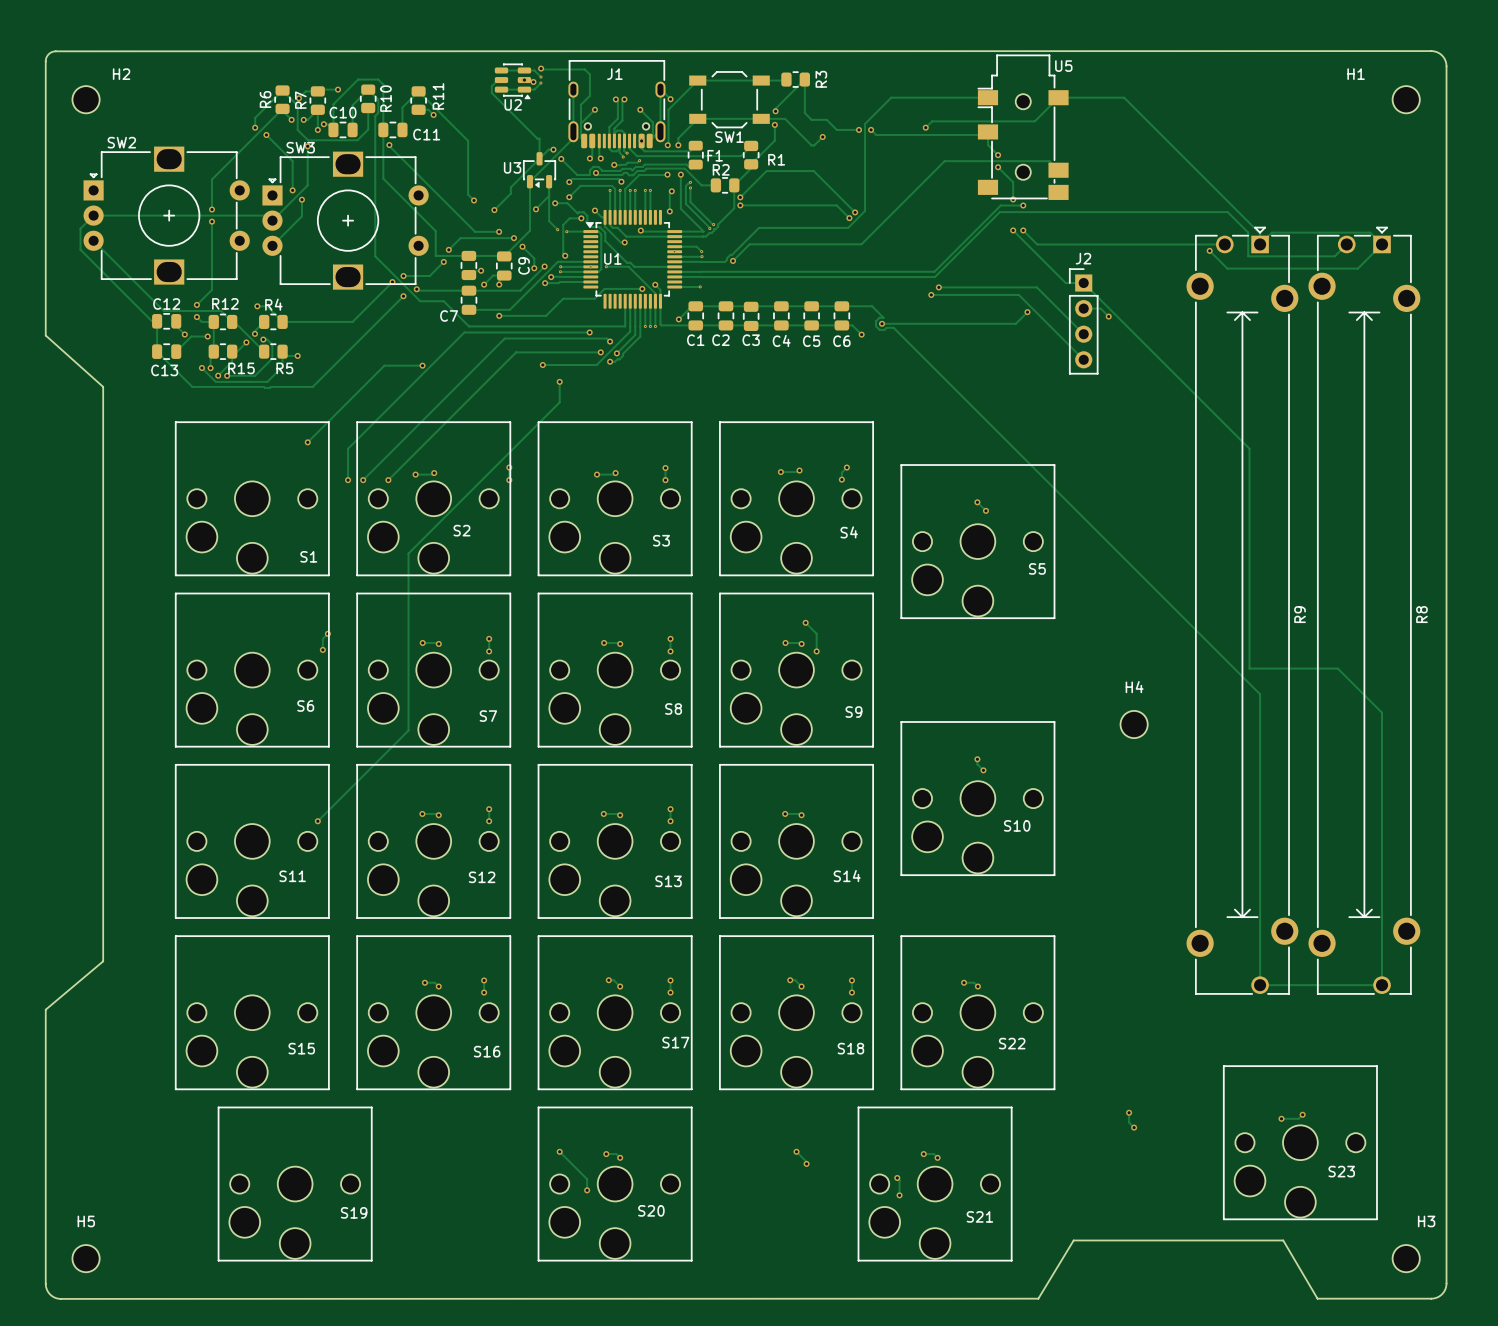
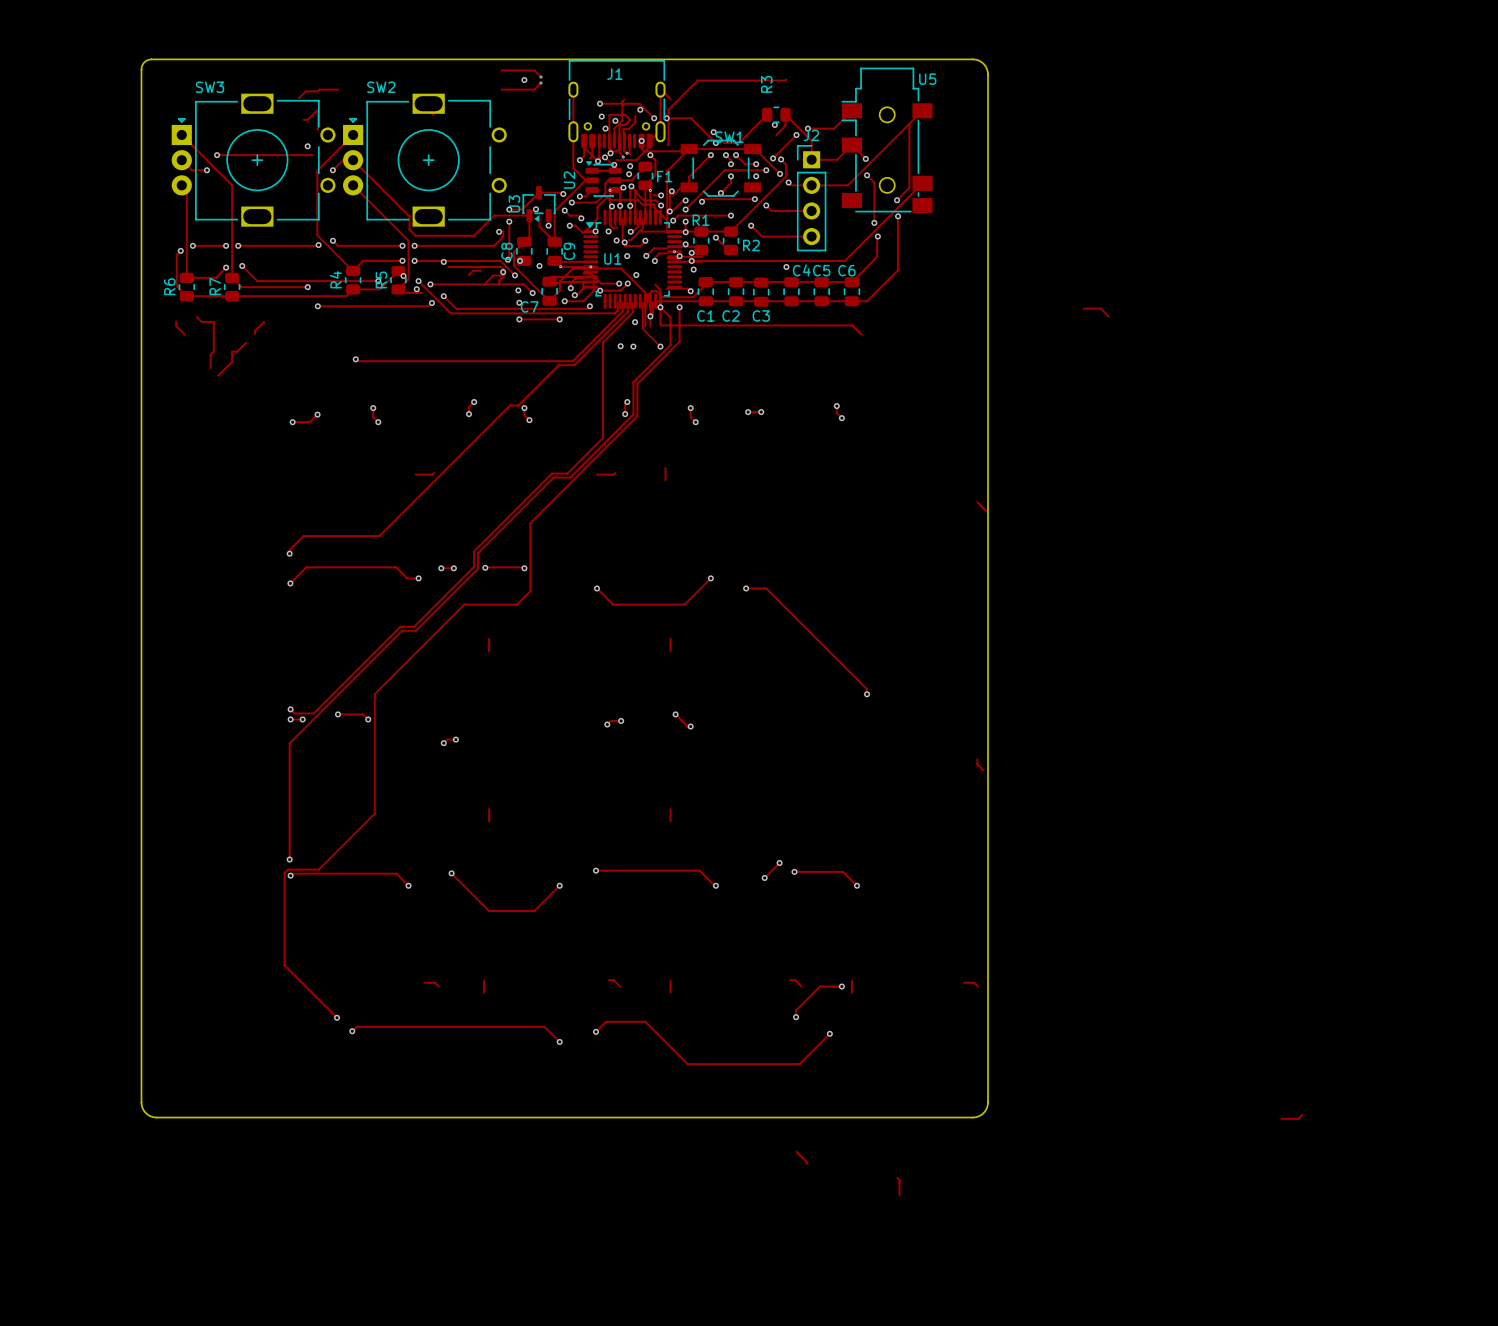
board edge: (1431, 51) (55, 51) (48, 54) (45, 61) (45, 335) (103, 386) (103, 961) (45, 1009) (45, 1283) (50, 1294) (60, 1298) (1038, 1298) (1073, 1240) (1283, 1240) (1317, 1298) (1431, 1298) (1442, 1294) (1446, 1283) (1446, 66) (1442, 55) (1431, 51) -> (151, 59) (144, 62) (141, 69) (141, 1102) (144, 1111) (150, 1116) (156, 1117) (972, 1117) (982, 1114) (986, 1108) (987, 1102) (987, 74) (984, 65) (978, 60) (972, 59) (151, 59)
track: (541, 68) (584, 69) (589, 74) (589, 95) (581, 104) (581, 137) (584, 140) -> none
via: (541, 68) -> none
R3 position: (795, 79) -> (776, 114)
R3 name position: R3 (821, 79) -> R3 (766, 84)
track: (501, 80) (497, 80) (491, 86) (491, 93) (539, 138) (539, 158) -> none
U2 rotation: 0° (512, 81) -> 180° (603, 178)
U2 position: (512, 81) -> (603, 178)
via: (533, 82) -> none
via: (337, 89) -> none
track: (987, 97) (891, 97) (865, 123) (865, 211) (848, 227) (758, 227) (724, 261) (701, 261) -> none
via: (298, 98) -> none
R10: (368, 98) -> none
H2: (86, 99) -> none
R6 position: (282, 99) -> (186, 287)
track: (615, 99) (617, 101) (617, 118) (609, 127) -> (619, 140) (619, 125) (625, 124) (630, 119) (625, 114) (610, 114) (609, 127)
via: (615, 99) -> none
via: (624, 99) -> none
via: (670, 99) -> none
SW1 position: (729, 99) -> (720, 168)
H1: (1406, 99) -> none
R7 position: (317, 100) -> (232, 287)
R11: (418, 100) -> none
track: none -> (600, 103) (639, 103) (654, 118)
via: none -> (600, 103)
U2 name position: U2 (513, 104) -> U2 (569, 180)
track: (368, 108) (368, 129) (357, 140) (308, 140) (297, 129) (297, 105) (282, 90) (255, 117) (255, 127) -> none
track: (594, 109) (581, 123) -> none
via: (594, 109) -> none
track: (640, 109) (652, 122) (652, 137) -> none
track: none -> (851, 110) (834, 128) (807, 128)
track: none -> (922, 110) (847, 185) (791, 185) (788, 182)
track: (775, 111) (775, 108) (804, 79) (804, 113) (811, 119) (826, 119) (836, 129) (858, 129) -> none
via: (775, 111) -> none
via: (433, 114) -> none
track: none -> (767, 114) (738, 143) (724, 143) (713, 132)
via: none -> (601, 116)
via: none -> (654, 118)
track: none -> (666, 118) (691, 118) (715, 143)
via: none -> (666, 118)
track: (291, 119) (282, 108) (212, 179) (212, 209) -> none
via: (291, 119) -> none
via: (303, 119) -> none
via: none -> (615, 120)
track: none -> (909, 123) (909, 187) (897, 200)
track: (323, 124) (327, 124) (333, 129) (333, 104) (358, 79) (378, 79) (383, 84) (383, 178) (435, 231) (435, 255) (504, 256) (529, 230) (529, 181) (573, 138) -> (539, 215) (539, 226) (554, 241) (554, 211) (585, 180) (573, 168) (573, 138)
via: (323, 124) -> none
track: (774, 124) (774, 140) (751, 164) (751, 168) (734, 185) (734, 208) (711, 233) (703, 236) -> none
via: (255, 127) -> none
track: (925, 127) (932, 121) (1034, 121) (1058, 97) (1124, 97) (1260, 233) (1260, 244) (1271, 232) (1370, 232) (1382, 244) (1357, 268) (1227, 268) (1209, 250) -> none
via: (925, 127) -> none
U5 position: (1023, 127) -> (887, 140)
via: none -> (605, 128)
via: none -> (807, 128)
via: (317, 129) -> none
C10: (343, 129) -> none
track: (352, 129) (352, 105) (368, 89) (378, 99) (378, 113) (375, 116) (375, 256) (420, 301) (443, 301) (468, 326) (625, 326) (625, 301) -> none
C11: (392, 129) -> none
track: (402, 129) (402, 107) (418, 91) (468, 140) (468, 194) (474, 200) -> none
via: (858, 129) -> none
track: (871, 129) (876, 134) (984, 134) (987, 131) (987, 145) (998, 155) -> none
via: (871, 129) -> none
track: (623, 132) (617, 130) (614, 133) -> (623, 132) (623, 128) (628, 128) (635, 122) (635, 115)
via: none -> (713, 132)
track: none -> (181, 134) (232, 185) (232, 277) (241, 287) (307, 287)
track: (266, 134) (292, 161) (292, 190) -> none
via: (266, 134) -> none
track: none -> (353, 134) (317, 170) (317, 235) (353, 271) (363, 260) (402, 260)
track: none -> (776, 134) (785, 125) (785, 114) (811, 140) (811, 159)
track: none -> (796, 134) (773, 158)
via: none -> (796, 134)
track: (822, 136) (814, 145) (811, 145) (785, 118) (697, 118) (678, 138) (678, 145) -> none
via: (822, 136) -> none
track: none -> (582, 140) (584, 140) (584, 155) (579, 160)
track: none -> (649, 140) (649, 146) (636, 160) (616, 160)
via: none -> (715, 143)
track: (389, 145) (475, 231) (499, 231) -> none
via: (389, 145) -> none
via: (667, 145) -> none
via: (678, 145) -> none
track: (751, 145) (740, 156) (637, 156) (629, 148) -> (630, 154) (629, 148)
SW2 footprint: [83, 146, 250, 285] -> [343, 93, 507, 227]
track: (307, 146) (307, 185) (272, 220) (267, 215) (93, 215) (80, 228) (80, 249) (152, 321) (157, 321) (157, 351) (192, 386) (312, 386) (403, 296) -> none
track: none -> (584, 147) (598, 161)
track: (553, 149) (548, 149) (510, 187) (510, 193) (494, 210) -> none
via: (553, 149) -> none
SW3 footprint: [262, 151, 429, 290] -> [171, 93, 336, 227]
via: none -> (610, 153)
track: none -> (217, 155) (312, 155)
via: none -> (217, 155)
track: none -> (650, 155) (655, 160) (655, 175) (645, 185)
via: none -> (650, 155)
F1 position: (695, 155) -> (645, 175)
track: none -> (710, 155) (689, 176) (689, 187) (681, 187) (673, 195)
via: none -> (710, 155)
track: none -> (725, 155) (731, 160) (731, 164)
via: none -> (725, 155)
track: none -> (736, 155) (745, 164) (756, 164)
via: none -> (736, 155)
R1 position: (751, 155) -> (701, 240)
via: (998, 155) -> none
track: none -> (605, 157) (615, 167) (615, 170) (592, 170)
via: none -> (605, 157)
track: (561, 158) (577, 174) (589, 174) (589, 170) (593, 166) (598, 166) (602, 170) (620, 170) (622, 168) (632, 170) (635, 166) (642, 166) (644, 164) (686, 164) (691, 169) (695, 164) -> none
via: (561, 158) -> none
via: (589, 158) -> none
via: (600, 158) -> none
via: none -> (773, 158)
track: none -> (865, 158) (851, 145) (837, 159) (802, 159)
via: none -> (865, 158)
R1 name position: R1 (776, 159) -> R1 (701, 220)
via: none -> (781, 159)
track: none -> (181, 160) (191, 170) (206, 170)
via: none -> (579, 160)
track: (639, 160) (625, 164) (614, 164) -> none
via: (639, 160) -> none
via: none -> (598, 161)
via: none -> (731, 164)
via: none -> (756, 164)
via: none -> (630, 166)
track: none -> (645, 166) (631, 180) (608, 180) (605, 183) (605, 193) (596, 202) (571, 202)
U3 name rotation: 0° (512, 167) -> 90° counterclockwise (514, 203)
track: (998, 167) (1013, 182) (1013, 199) -> none
via: (998, 167) -> none
via: none -> (206, 170)
track: none -> (332, 170) (343, 160) (353, 160) (409, 216) (409, 229) (415, 235) (474, 235) (494, 215) (529, 215) (529, 236) (513, 252) (513, 265) (548, 300) (560, 290) (560, 281) (572, 268) (621, 268) (647, 295)
via: none -> (332, 170)
U3 position: (539, 170) -> (539, 204)
track: none -> (766, 170) (724, 170) (685, 209)
via: none -> (766, 170)
track: (1058, 170) (1049, 161) (944, 161) (922, 183) -> none
track: (595, 172) (597, 174) (622, 174) (626, 172) (633, 175) (637, 171) (644, 171) (646, 168) (684, 168) (701, 185) (715, 185) -> none
via: (595, 172) -> none
track: none -> (780, 173) (755, 149) (689, 149) (667, 171) (667, 233)
via: none -> (780, 173)
via: none -> (629, 174)
track: (667, 174) (639, 175) (625, 189) (625, 217) -> none
via: (667, 174) -> none
track: (680, 174) (680, 208) (703, 231) -> (781, 159) (786, 164) (786, 176) (731, 231) (703, 231)
via: (680, 174) -> none
track: none -> (867, 175) (874, 182) (874, 222)
via: none -> (867, 175)
track: none -> (731, 176) (731, 183) (720, 193)
via: none -> (731, 176)
via: none -> (756, 176)
track: (549, 181) (549, 221) (557, 229) -> none
track: (621, 181) (618, 179) (572, 179) (569, 182) -> none
via: (621, 181) -> none
via: (569, 182) -> none
track: (690, 182) (685, 186) (685, 203) (709, 228) -> none
via: (690, 182) -> none
via: none -> (788, 182)
track: none -> (181, 185) (186, 190) (186, 277) (215, 277) (226, 267)
track: none -> (353, 185) (408, 240) (408, 279) (398, 289) (401, 292) (421, 292)
R2 rotation: 0° (725, 185) -> 90° clockwise (731, 240)
R2 position: (725, 185) -> (731, 240)
track: none -> (631, 186) (644, 200) (656, 200) (661, 205)
via: none -> (631, 186)
via: none -> (623, 187)
track: (690, 187) (690, 202) (713, 224) -> none
via: (690, 187) -> none
track: none -> (592, 189) (585, 196) (579, 196)
via: (292, 190) -> none
via: (620, 190) -> none
via: (630, 190) -> none
via: (635, 190) -> none
via: (645, 190) -> none
via: none -> (720, 193)
track: none -> (563, 194) (539, 192) (522, 209) (509, 209)
via: none -> (563, 194)
track: none -> (653, 194) (661, 195)
track: (549, 195) (536, 209) -> none
via: none -> (661, 195)
via: none -> (579, 196)
track: (569, 197) (580, 185) (611, 185) (615, 189) (615, 217) -> none
via: (569, 197) -> none
track: (740, 197) (766, 171) (813, 171) (855, 212) -> none
via: (740, 197) -> none
track: (301, 199) (301, 216) (272, 245) -> none
via: (301, 199) -> none
track: none -> (754, 199) (704, 199) (702, 201)
via: none -> (754, 199)
via: (1013, 199) -> none
via: (474, 200) -> none
track: none -> (685, 200) (683, 200) (673, 210)
via: none -> (685, 200)
via: none -> (897, 200)
via: none -> (702, 201)
via: none -> (571, 202)
track: (555, 203) (567, 203) (577, 213) (583, 212) (587, 215) (586, 222) (591, 227) (600, 227) (605, 232) (605, 241) (626, 262) (630, 262) (634, 266) (674, 266) -> none
via: (555, 203) -> none
via: none -> (620, 205)
via: none -> (630, 205)
via: none -> (661, 205)
track: (740, 205) (836, 205) (849, 218) -> none
via: (740, 205) -> none
track: none -> (766, 205) (771, 210) (811, 210)
via: none -> (766, 205)
track: (1023, 205) (1000, 205) (934, 271) (701, 271) -> none
via: (1023, 205) -> none
via: none -> (611, 206)
via: (212, 209) -> none
via: none -> (509, 209)
via: none -> (685, 209)
via: (494, 210) -> none
track: none -> (564, 210) (569, 215) (579, 215)
via: none -> (564, 210)
track: (594, 210) (601, 217) (605, 217) (605, 226) (620, 242) (624, 242) -> none
via: (594, 210) -> none
via: (855, 212) -> none
track: none -> (731, 215) (678, 215) (673, 220)
via: none -> (731, 215)
track: none -> (898, 216) (898, 270) (867, 301) (654, 301) (652, 313) (650, 316)
via: none -> (898, 216)
track: (581, 218) (569, 218) (563, 224) (563, 253) (565, 255) -> none
via: (849, 218) -> none
track: none -> (622, 219) (622, 243) (625, 246) (640, 246) (645, 240)
track: none -> (637, 219) (637, 226) (630, 231)
track: none -> (642, 219) (642, 228) (628, 240)
track: none -> (667, 220) (654, 207) (654, 204) (642, 204) (637, 199) (609, 199) (607, 197) (597, 206) (597, 219) (583, 233) (575, 225) (569, 225)
via: none -> (673, 220)
track: (212, 221) (212, 289) (196, 304) -> none
via: (212, 221) -> none
track: none -> (509, 221) (507, 259)
via: none -> (509, 221)
track: none -> (685, 221) (685, 232)
via: none -> (685, 221)
via: none -> (874, 222)
via: (713, 224) -> none
via: none -> (548, 225)
via: none -> (569, 225)
track: none -> (751, 225) (762, 236) (811, 236)
via: none -> (751, 225)
track: (617, 227) (626, 236) (702, 236) -> none
via: (709, 228) -> none
via: (557, 229) -> none
track: none -> (503, 230) (503, 236) (494, 245) (414, 245)
via: (640, 230) -> none
track: (1013, 230) (1065, 283) (1083, 283) (1249, 448) (1249, 668) (1337, 668) (1382, 712) (1382, 985) (1260, 985) (1260, 694) (893, 327) (879, 329) (875, 326) (875, 321) (879, 317) (883, 317) (872, 306) (691, 306) (678, 319) -> none
via: (1013, 230) -> none
track: (1023, 230) (1037, 244) (1224, 244) -> none
via: (1023, 230) -> none
track: (566, 231) (598, 231) (601, 234) (601, 269) (598, 271) (560, 271) -> none
via: (566, 231) -> none
via: none -> (595, 231)
via: none -> (608, 231)
via: none -> (630, 231)
via: none -> (685, 232)
track: none -> (877, 236) (877, 256) (851, 282) (705, 282) (705, 284) (693, 297) (662, 297) (656, 291) (651, 291) (647, 295)
via: none -> (877, 236)
track: none -> (715, 237) (728, 249) (731, 249)
via: none -> (715, 237)
track: (513, 238) (460, 238) (448, 249) -> none
via: (513, 238) -> none
track: (93, 240) (163, 310) (221, 310) (264, 351) -> none
track: none -> (332, 240) (337, 245) (402, 245)
via: none -> (332, 240)
via: none -> (616, 240)
via: none -> (645, 240)
via: none -> (685, 244)
track: (861, 244) (749, 244) (733, 260) -> (861, 244) (844, 260) (691, 260)
track: (1346, 244) (1334, 256) (1248, 256) (1248, 232) (1227, 212) (999, 212) (934, 277) (701, 277) -> none
track: none -> (192, 245) (226, 245)
via: none -> (192, 245)
via: none -> (226, 245)
via: none -> (238, 245)
track: none -> (318, 245) (238, 245)
via: none -> (318, 245)
via: none -> (402, 245)
via: none -> (414, 245)
track: (522, 246) (534, 258) (534, 268) -> none
via: (522, 246) -> none
track: none -> (667, 248) (653, 248) (646, 255)
via: (448, 249) -> none
track: none -> (180, 250) (176, 254) (176, 286) (186, 296) (346, 296) (353, 289) (380, 289) (398, 271) (402, 271)
via: none -> (180, 250)
via: (1209, 250) -> none
C8: none -> (524, 251)
via: (701, 251) -> none
via: none -> (691, 252)
track: none -> (667, 253) (659, 253) (654, 257) (654, 261)
via: (565, 255) -> none
via: none -> (646, 255)
via: none -> (627, 256)
track: none -> (679, 256) (677, 258) (667, 258)
via: none -> (679, 256)
via: (702, 256) -> none
via: none -> (507, 259)
via: none -> (402, 260)
track: none -> (414, 260) (500, 260) (515, 275)
via: none -> (414, 260)
via: none -> (520, 260)
via: none -> (691, 260)
via: (733, 260) -> none
track: (443, 261) (429, 276) (403, 276) -> none
track: (560, 261) (557, 261) (509, 309) (468, 309) -> none
via: none -> (654, 261)
track: none -> (242, 265) (257, 281) (378, 281)
via: none -> (242, 265)
part: (468, 265) -> none
C9 position: (504, 265) -> (554, 251)
C9 name position: C9 (524, 265) -> C9 (569, 251)
via: none -> (539, 265)
track: none -> (448, 266) (500, 266) (503, 272)
track: (544, 266) (520, 290) (415, 290) -> none
via: (544, 266) -> none
track: (606, 266) (628, 266) (655, 293) (655, 326) -> none
via: (606, 266) -> none
via: none -> (786, 266)
via: none -> (226, 267)
via: (534, 268) -> none
via: none -> (693, 269)
via: (481, 270) -> none
via: (560, 271) -> none
track: (674, 271) (701, 271) -> none
via: none -> (503, 272)
track: none -> (583, 273) (591, 273) (601, 283) (619, 283)
via: none -> (515, 275)
via: none -> (636, 275)
track: none -> (593, 276) (593, 291) (583, 301) (564, 301)
track: (674, 276) (700, 276) -> none
via: (551, 277) -> none
track: none -> (583, 278) (575, 278) (570, 283) (570, 288)
via: none -> (378, 281)
track: none -> (418, 281) (450, 313) (614, 313) (617, 310) (617, 302)
via: none -> (418, 281)
track: (392, 282) (352, 321) (282, 321) (266, 306) (257, 306) -> none
via: (392, 282) -> none
via: (545, 283) -> none
track: none -> (583, 283) (583, 288) (574, 295)
via: none -> (619, 283)
track: none -> (627, 283) (620, 290) (600, 290)
via: none -> (627, 283)
track: none -> (430, 284) (523, 284) (532, 293)
via: none -> (430, 284)
via: (484, 284) -> none
via: (499, 284) -> none
via: (655, 284) -> none
via: (700, 286) -> none
via: none -> (307, 287)
track: (674, 287) (700, 287) -> none
track: (938, 287) (1036, 287) (1083, 334) -> none
via: (938, 287) -> none
via: none -> (570, 288)
track: (642, 288) (604, 288) (594, 298) (563, 298) (546, 315) (499, 315) -> none
via: (642, 288) -> none
track: none -> (667, 288) (688, 288) (690, 291)
via: none -> (518, 290)
via: none -> (600, 290)
via: none -> (690, 291)
via: none -> (532, 293)
track: (931, 294) (1018, 294) (1083, 359) -> none
via: (931, 294) -> none
via: none -> (574, 295)
track: none -> (647, 295) (647, 302)
via: (403, 296) -> none
track: none -> (443, 296) (456, 308) (587, 308) (589, 306)
via: none -> (443, 296)
C7 position: (468, 300) -> (549, 291)
via: none -> (564, 301)
track: (630, 301) (630, 331) (596, 365) (542, 365) -> none
track: (635, 301) (635, 335) (616, 353) -> none
track: (640, 301) (640, 336) (619, 359) (610, 361) -> none
via: none -> (519, 302)
track: none -> (622, 302) (622, 311) (572, 361) (357, 361) (355, 359)
track: none -> (627, 302) (627, 311) (574, 365) (558, 365) (518, 405) (510, 405) (379, 536) (303, 536) (289, 549) (289, 553)
track: none -> (632, 302) (632, 312) (603, 342) (603, 437) (567, 473) (551, 473) (474, 551) (474, 566) (414, 626) (400, 626) (313, 713) (294, 713) (290, 709)
track: none -> (642, 302) (642, 328) (660, 346)
track: none -> (431, 303) (428, 306) (317, 306)
via: none -> (431, 303)
via: (196, 304) -> none
R4 name position: R4 (273, 304) -> R4 (335, 279)
via: (257, 306) -> none
via: none -> (317, 306)
via: none -> (589, 306)
track: none -> (660, 307) (670, 317) (670, 345) (633, 382) (633, 414) (570, 477) (553, 477) (478, 553) (478, 568) (415, 630) (402, 630) (289, 743) (289, 859)
via: none -> (660, 307)
track: none -> (679, 307) (679, 341) (637, 383) (637, 416) (530, 523) (530, 591) (517, 604) (464, 604) (374, 694) (374, 813) (318, 869) (288, 869) (284, 873) (284, 965) (336, 1017)
via: none -> (679, 307)
track: (1027, 312) (1015, 323) (882, 323) -> none
via: (1027, 312) -> none
via: (499, 315) -> none
C1 position: (695, 315) -> (705, 291)
C2 position: (725, 315) -> (736, 291)
C4 position: (781, 315) -> (791, 291)
C5 position: (811, 315) -> (821, 291)
C6 position: (841, 315) -> (851, 291)
via: none -> (650, 316)
C3 position: (751, 316) -> (761, 292)
via: (1108, 316) -> none
via: (196, 317) -> none
track: none -> (519, 319) (559, 319)
via: none -> (519, 319)
via: none -> (559, 319)
via: (678, 319) -> none
C12: (166, 321) -> none
R12: (222, 321) -> none
R4 rotation: 0° (273, 321) -> 90° clockwise (353, 280)
R4 position: (273, 321) -> (353, 280)
J2 position: (1083, 321) -> (811, 198)
via: none -> (635, 322)
via: (882, 323) -> none
via: (645, 326) -> none
via: (650, 326) -> none
via: (655, 326) -> none
track: (589, 332) (464, 332) (348, 448) (348, 480) -> none
via: (589, 332) -> none
via: (254, 333) -> none
via: (184, 334) -> none
via: (861, 334) -> none
track: (207, 336) (191, 336) (176, 351) -> none
via: (207, 336) -> none
track: (263, 339) (267, 339) (272, 344) (272, 358) (255, 375) (227, 375) -> none
via: (263, 339) -> none
C4 name position: C4 (781, 340) -> C4 (801, 270)
track: (610, 341) (607, 338) (504, 338) (363, 480) -> none
via: (610, 341) -> none
C5 name position: C5 (811, 341) -> C5 (821, 270)
C6 name position: C6 (841, 341) -> C6 (846, 270)
via: (246, 342) -> none
via: none -> (620, 346)
via: none -> (633, 346)
via: none -> (660, 346)
C13: (166, 351) -> none
R15: (222, 351) -> none
R5 rotation: 0° (273, 351) -> 90° clockwise (398, 280)
R5 position: (273, 351) -> (398, 280)
track: (600, 352) (516, 352) (388, 480) -> none
via: (600, 352) -> none
via: (616, 353) -> none
track: (297, 355) (286, 355) (282, 351) (282, 366) (267, 381) (215, 381) (201, 368) -> none
via: (297, 355) -> none
via: none -> (355, 359)
via: (610, 361) -> none
track: (422, 365) (384, 365) (307, 442) -> none
via: (422, 365) -> none
via: (542, 365) -> none
via: (201, 368) -> none
via: (210, 368) -> none
via: (218, 375) -> none
via: (227, 375) -> none
track: (559, 381) (559, 402) (408, 553) (408, 730) (317, 821) -> none
via: (559, 381) -> none
track: none -> (474, 402) (468, 407) (468, 414)
via: none -> (474, 402)
track: none -> (627, 402) (625, 404) (625, 414)
via: none -> (627, 402)
track: none -> (836, 406) (836, 413) (841, 418)
via: none -> (836, 406)
track: none -> (373, 408) (373, 417) (378, 422)
via: none -> (373, 408)
track: none -> (524, 408) (524, 415) (529, 420)
via: none -> (524, 408)
track: none -> (690, 408) (690, 417) (695, 422)
via: none -> (690, 408)
track: none -> (748, 412) (761, 412)
via: none -> (748, 412)
via: none -> (761, 412)
track: none -> (317, 414) (310, 422) (292, 422)
via: none -> (317, 414)
via: none -> (468, 414)
via: none -> (625, 414)
via: none -> (841, 418)
via: none -> (529, 420)
via: none -> (292, 422)
via: none -> (378, 422)
via: none -> (695, 422)
via: (307, 442) -> none
via: (509, 467) -> none
track: (846, 467) (841, 472) (841, 479) -> none
via: (846, 467) -> none
via: (665, 468) -> none
track: (799, 470) (780, 472) -> none
via: (799, 470) -> none
via: (780, 472) -> none
via: (434, 473) -> none
via: (615, 473) -> none
via: (415, 474) -> none
via: (596, 474) -> none
via: (841, 479) -> none
via: (348, 480) -> none
via: (363, 480) -> none
via: (388, 480) -> none
via: (509, 480) -> none
via: (665, 480) -> none
S1: (252, 498) -> none
S2: (433, 498) -> none
S3: (615, 498) -> none
S4: (796, 498) -> none
via: (977, 502) -> none
via: (985, 510) -> none
S5: (977, 541) -> none
via: none -> (289, 553)
track: none -> (485, 567) (524, 568)
via: none -> (485, 567)
track: none -> (441, 568) (453, 568)
via: none -> (441, 568)
via: none -> (453, 568)
via: none -> (524, 568)
track: none -> (418, 578) (407, 578) (396, 567) (306, 567) (290, 583)
via: none -> (418, 578)
track: none -> (710, 578) (684, 604) (613, 604) (596, 588)
via: none -> (710, 578)
via: none -> (290, 583)
via: none -> (596, 588)
track: none -> (746, 588) (766, 588) (867, 689) (867, 694)
via: none -> (746, 588)
R9: (1242, 610) -> none
R8: (1364, 610) -> none
track: (805, 622) (816, 633) (816, 651) -> none
via: (805, 622) -> none
track: (327, 633) (322, 638) (322, 649) -> none
via: (327, 633) -> none
via: (489, 638) -> none
via: (670, 638) -> none
track: (422, 642) (438, 643) -> none
via: (422, 642) -> none
track: (604, 642) (620, 643) -> none
via: (604, 642) -> none
track: (785, 642) (801, 643) -> none
via: (785, 642) -> none
via: (438, 643) -> none
via: (620, 643) -> none
via: (801, 643) -> none
via: (322, 649) -> none
via: (489, 651) -> none
via: (670, 651) -> none
via: (816, 651) -> none
S6: (252, 670) -> none
S7: (433, 670) -> none
S8: (615, 670) -> none
S9: (796, 670) -> none
via: none -> (867, 694)
via: none -> (290, 709)
track: none -> (337, 714) (363, 714) (368, 719)
via: none -> (337, 714)
track: none -> (675, 714) (687, 726) (690, 726)
via: none -> (675, 714)
track: none -> (290, 719) (302, 719)
via: none -> (290, 719)
via: none -> (302, 719)
via: none -> (368, 719)
track: none -> (621, 720) (610, 720) (607, 724)
via: none -> (621, 720)
via: none -> (607, 724)
H4: (1134, 724) -> none
via: none -> (690, 726)
track: none -> (455, 739) (447, 739) (443, 743)
via: none -> (455, 739)
via: none -> (443, 743)
via: (977, 759) -> none
via: (983, 770) -> none
S10: (977, 798) -> none
via: (489, 809) -> none
via: (670, 809) -> none
track: (422, 813) (438, 815) -> none
via: (422, 813) -> none
track: (603, 813) (620, 815) -> none
via: (603, 813) -> none
track: (785, 813) (801, 815) -> none
via: (785, 813) -> none
via: (438, 815) -> none
via: (620, 815) -> none
via: (801, 815) -> none
via: (317, 821) -> none
via: (489, 821) -> none
via: (670, 821) -> none
S11: (252, 841) -> none
S12: (433, 841) -> none
S13: (615, 841) -> none
S14: (796, 841) -> none
via: none -> (289, 859)
track: none -> (779, 862) (764, 877)
via: none -> (779, 862)
track: none -> (595, 870) (699, 870) (715, 885)
via: none -> (595, 870)
track: none -> (794, 871) (843, 871) (856, 885)
via: none -> (794, 871)
track: none -> (451, 873) (489, 910) (534, 910) (559, 885)
via: none -> (451, 873)
track: none -> (290, 875) (292, 873) (396, 873) (408, 885)
via: none -> (290, 875)
via: none -> (764, 877)
via: none -> (408, 885)
via: none -> (559, 885)
via: none -> (715, 885)
via: none -> (856, 885)
via: (484, 980) -> none
via: (608, 980) -> none
via: (670, 980) -> none
via: (790, 980) -> none
via: (851, 980) -> none
via: (424, 982) -> none
via: (964, 982) -> none
via: (438, 986) -> none
via: (620, 986) -> none
via: (801, 986) -> none
track: none -> (841, 986) (820, 986) (796, 1010) (796, 1017)
via: none -> (841, 986)
via: (977, 986) -> none
via: (484, 992) -> none
via: (670, 992) -> none
via: (851, 992) -> none
S15: (252, 1012) -> none
S16: (433, 1012) -> none
S17: (615, 1012) -> none
S18: (796, 1012) -> none
S22: (977, 1012) -> none
via: none -> (336, 1017)
via: none -> (796, 1017)
track: none -> (352, 1031) (356, 1026) (544, 1026) (559, 1041)
via: none -> (352, 1031)
track: none -> (595, 1031) (606, 1021) (645, 1021) (687, 1064) (799, 1064) (829, 1033)
via: none -> (595, 1031)
via: none -> (829, 1033)
via: none -> (559, 1041)
track: (1129, 1112) (1129, 1122) (1134, 1127) -> none
via: (1129, 1112) -> none
via: (1302, 1114) -> none
via: (1281, 1118) -> none
via: (1134, 1127) -> none
S23: (1300, 1142) -> none
track: (559, 1151) (587, 1179) (587, 1190) -> none
via: (559, 1151) -> none
via: (796, 1151) -> none
track: (606, 1154) (616, 1154) (620, 1157) -> none
via: (606, 1154) -> none
track: (923, 1154) (933, 1154) (937, 1157) -> none
via: (923, 1154) -> none
via: (620, 1157) -> none
via: (937, 1157) -> none
via: (806, 1163) -> none
via: (897, 1178) -> none
S19: (295, 1184) -> none
S20: (615, 1184) -> none
S21: (935, 1184) -> none
via: (587, 1190) -> none
via: (899, 1195) -> none
H5: (86, 1258) -> none
H3: (1406, 1258) -> none

